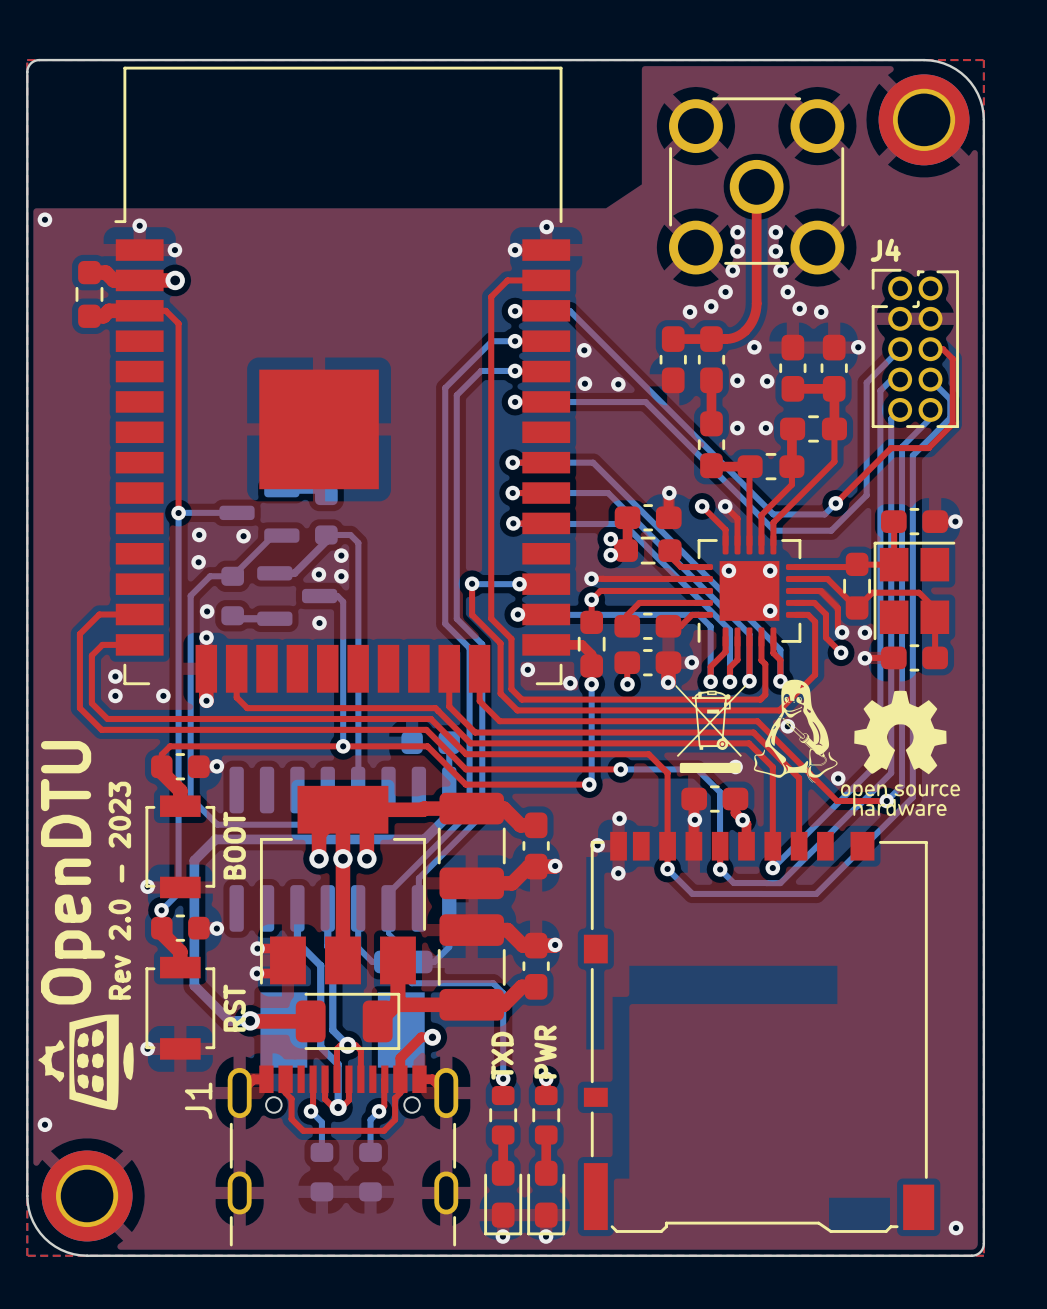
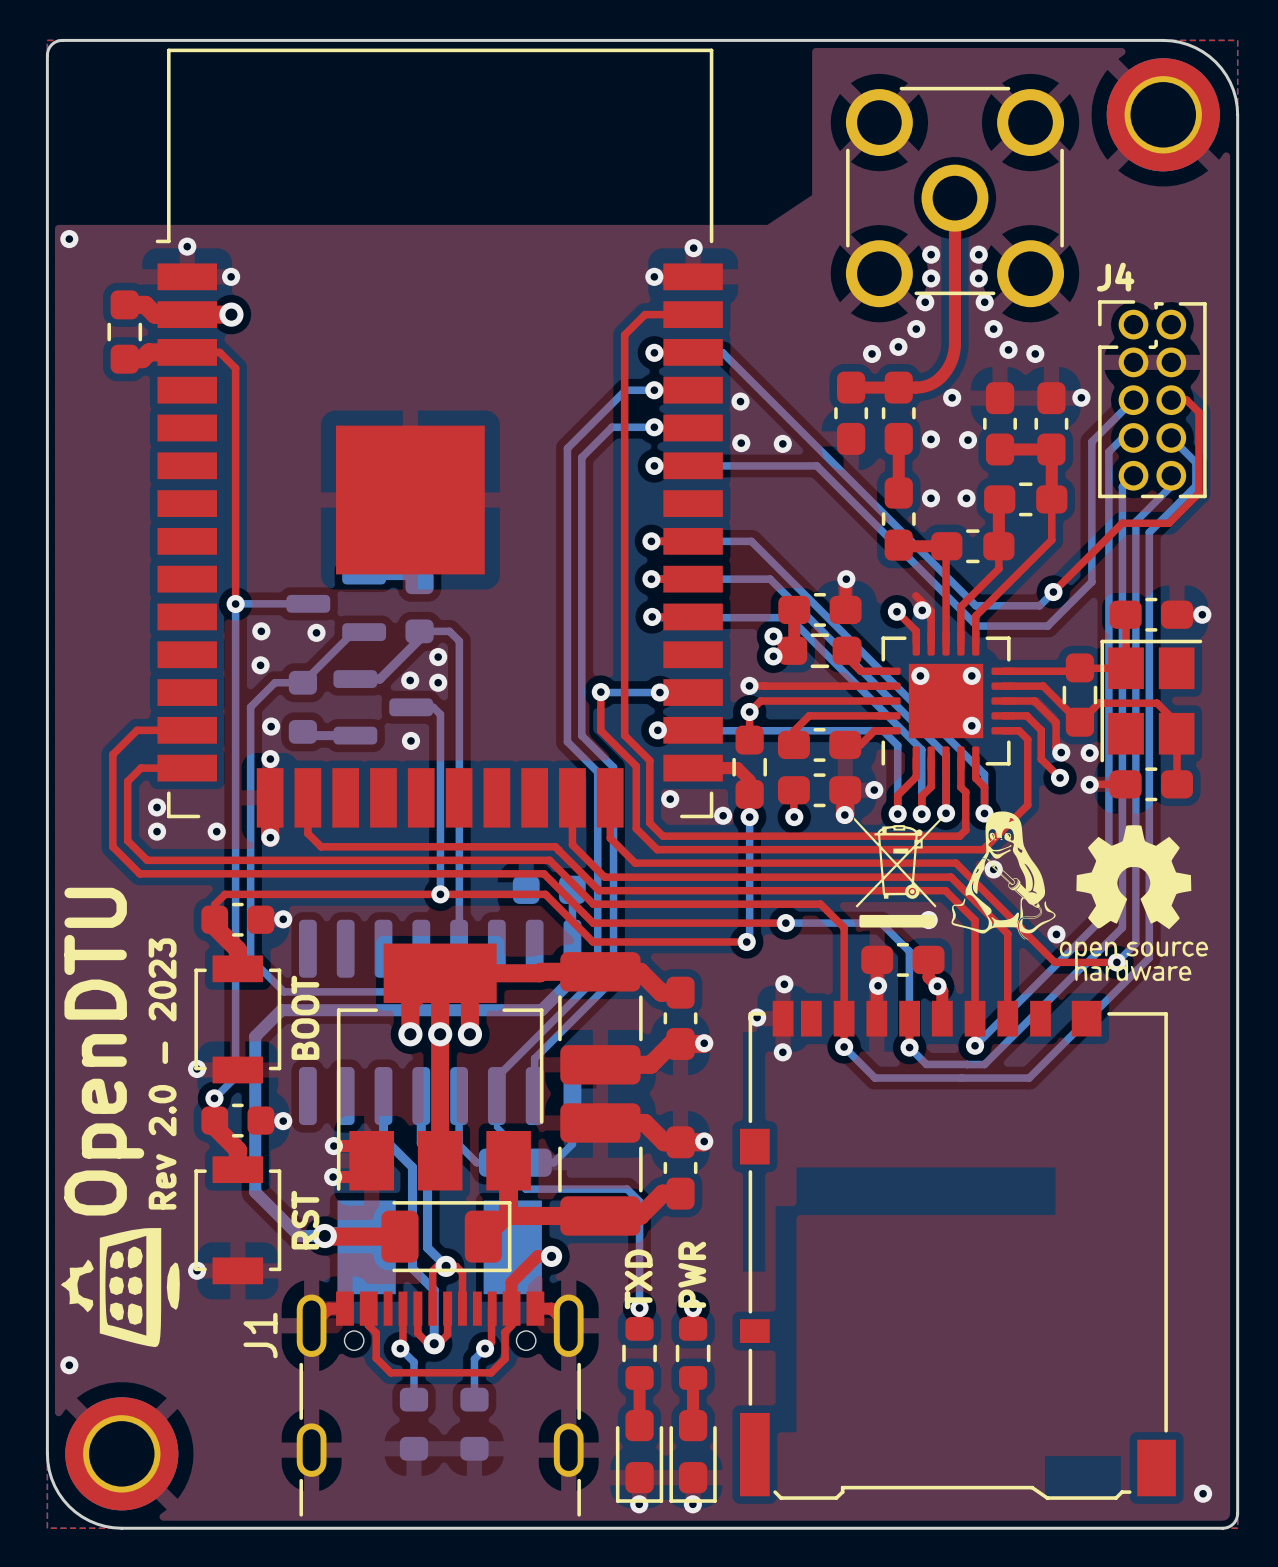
top track: (702, 506) (725, 529) (725, 534) -> (896, 611) (916, 631)
via position: (702, 506) -> (896, 611)
via position: (725, 506) -> (922, 610)

